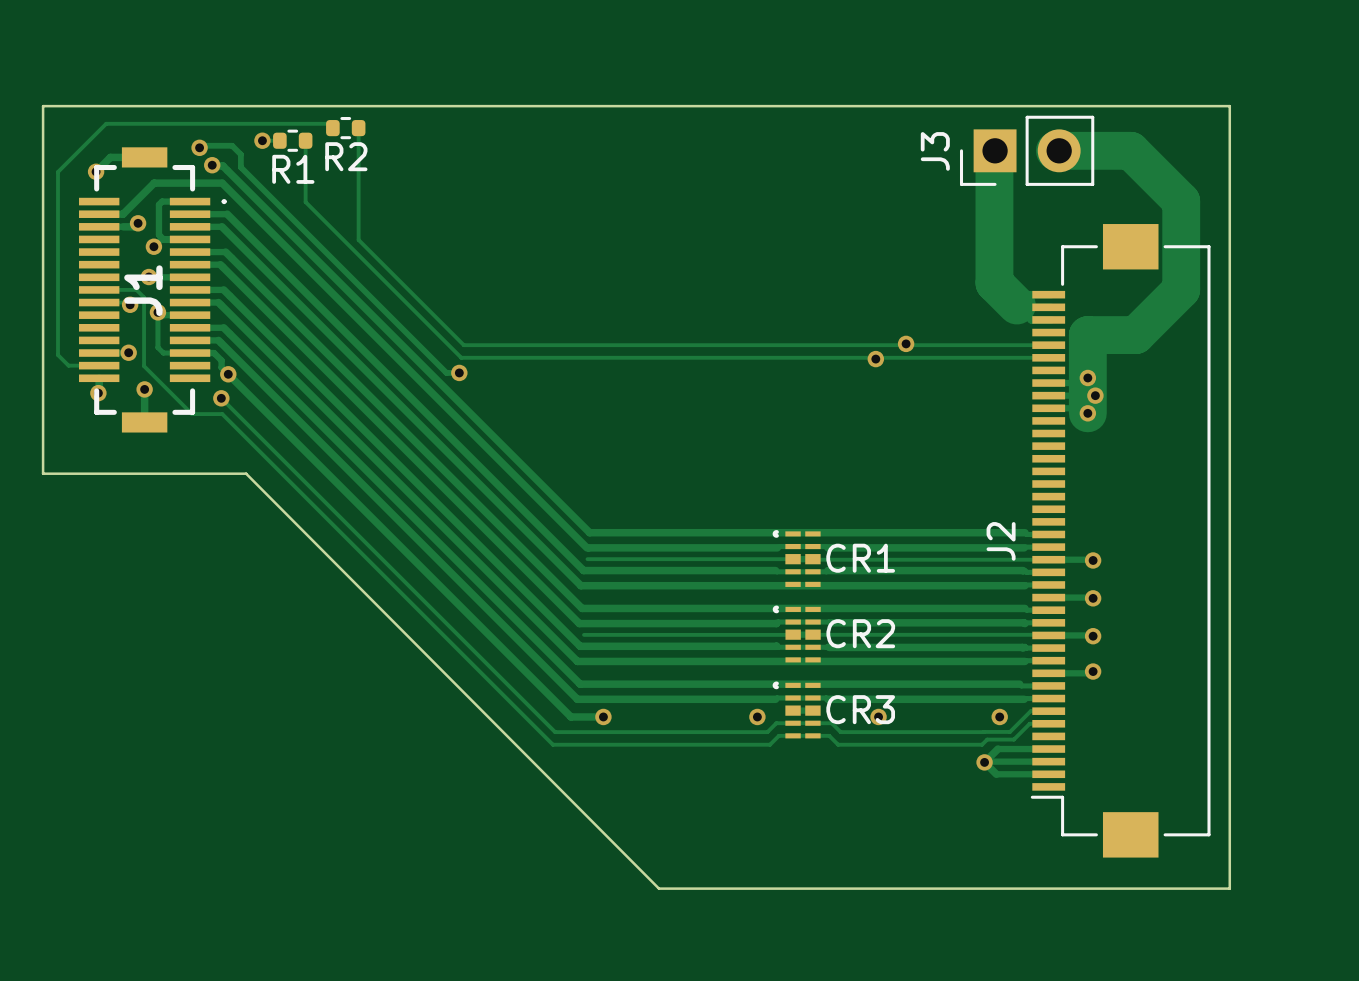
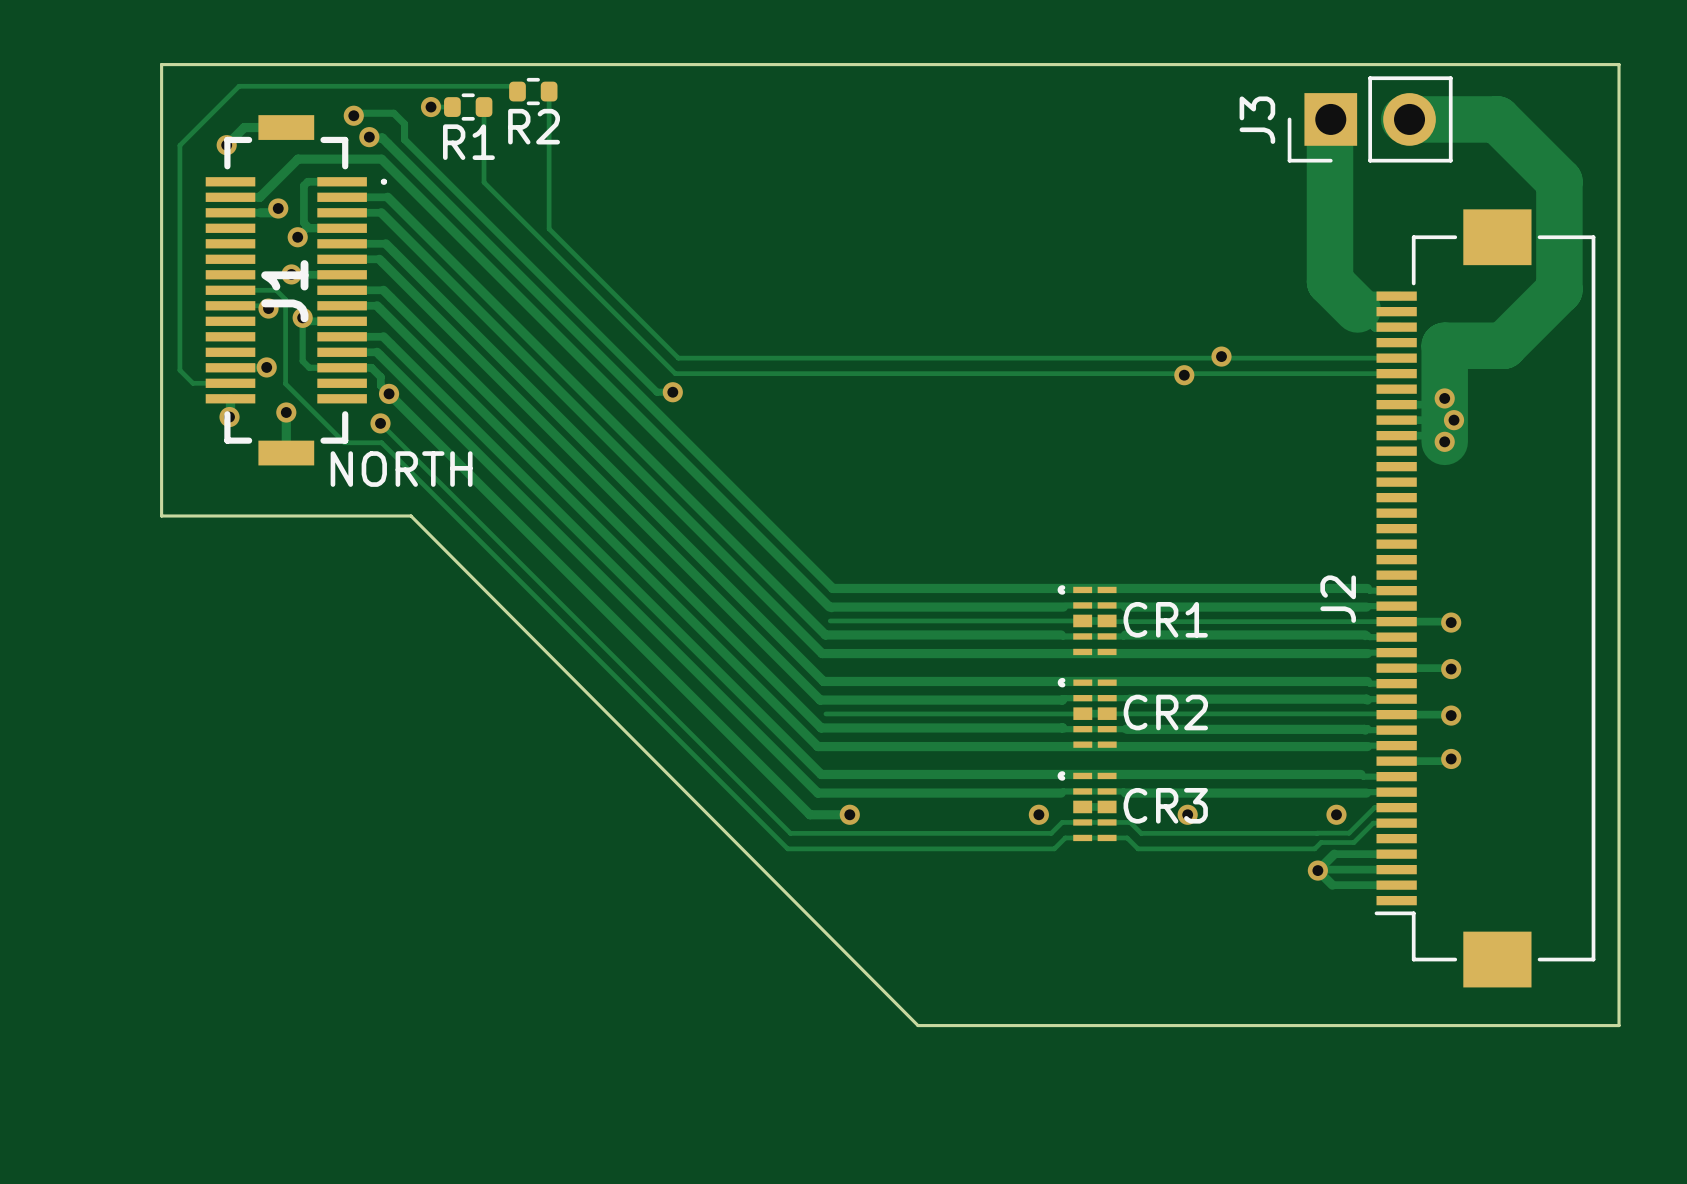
text: none -> NORTH (401, 469)

